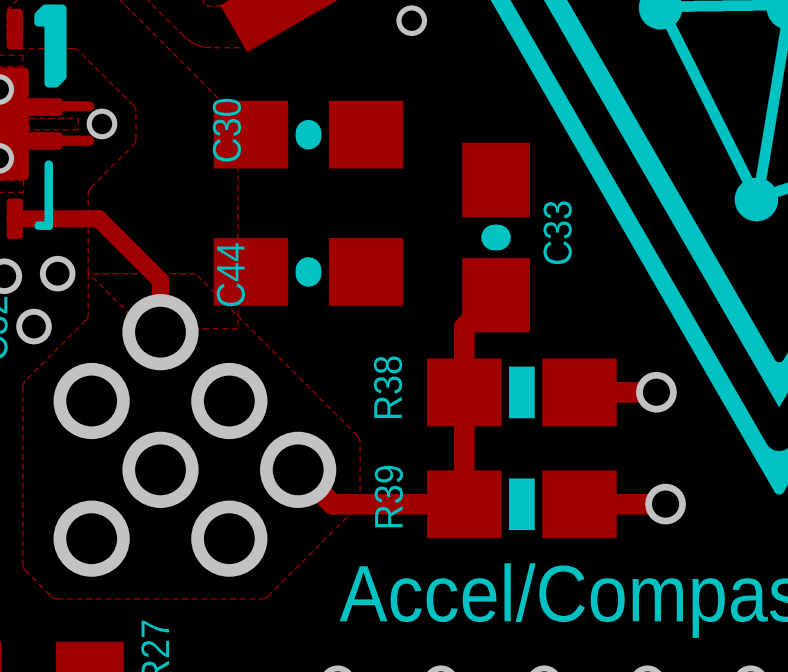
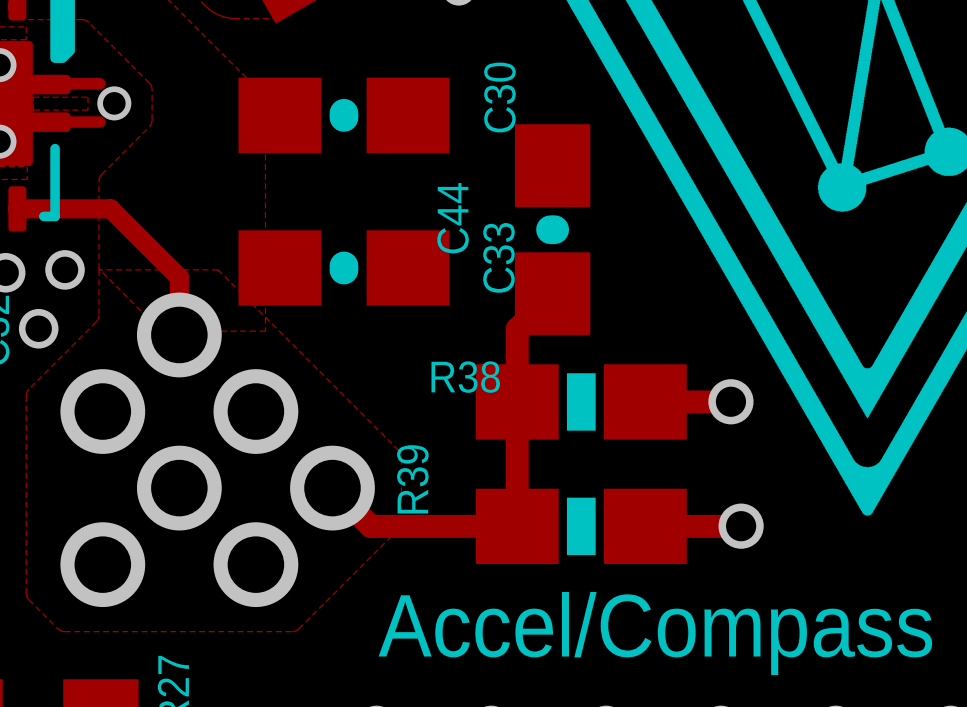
text position: C30 (226, 130) -> C30 (499, 97)
C33 name position: C33 (557, 232) -> C33 (498, 257)
C44 name position: C44 (230, 274) -> C44 (453, 218)
R38 name rotation: 0° (387, 387) -> 90° clockwise (465, 377)
R39 name position: R39 (388, 496) -> R39 (412, 479)

